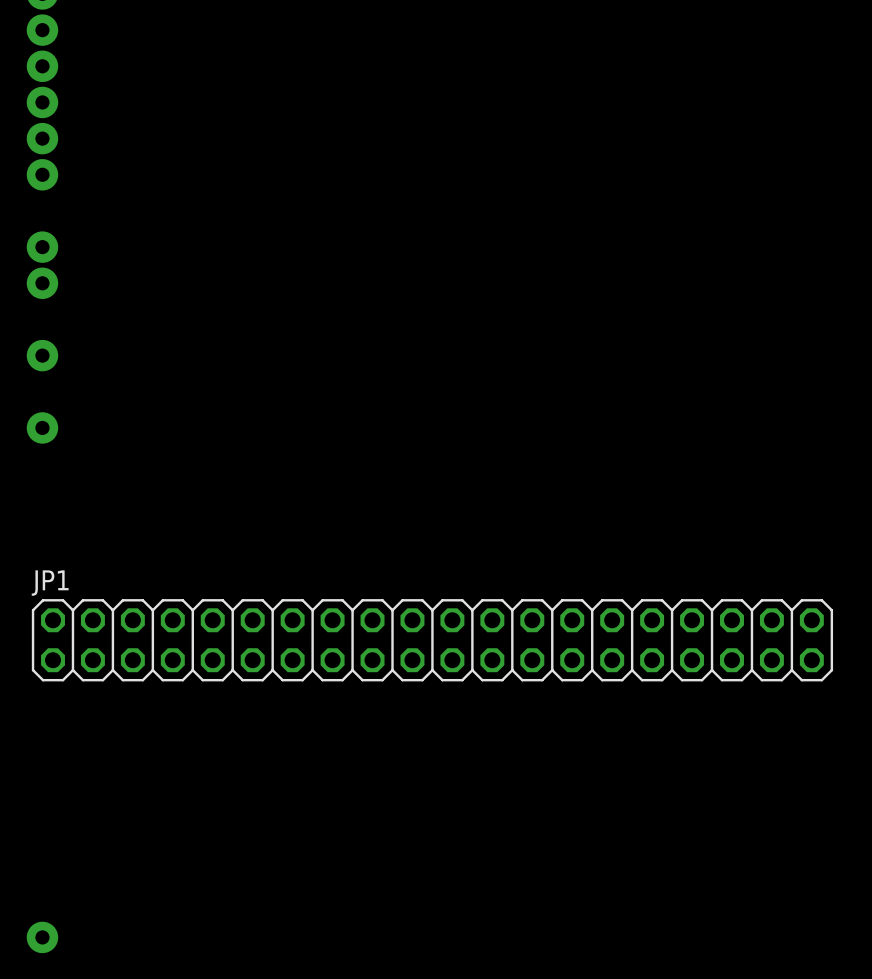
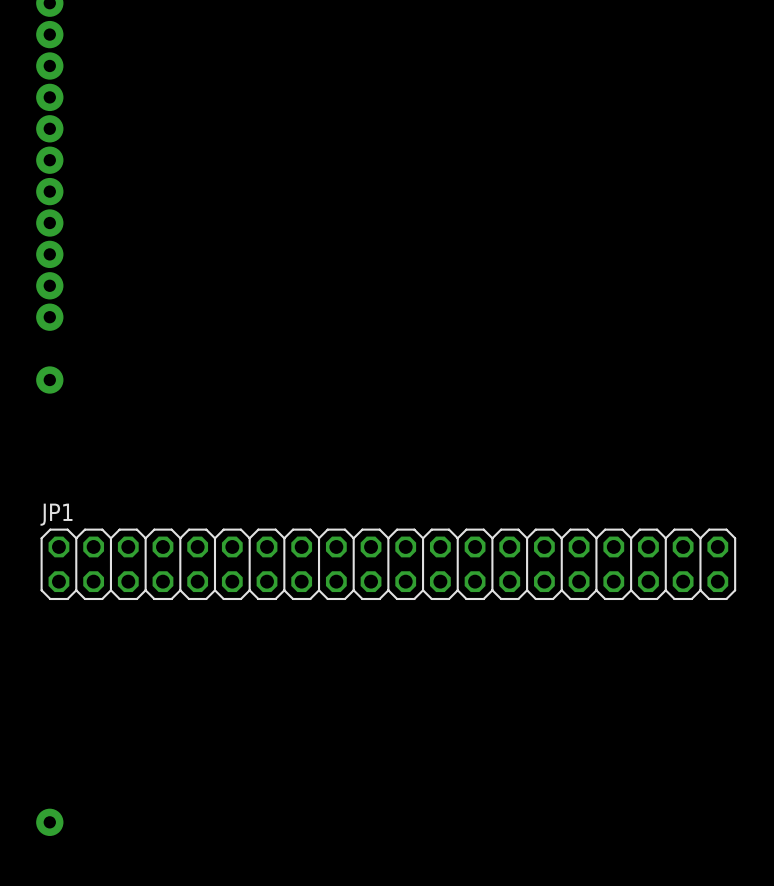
part: none -> (49, 191)
part: none -> (49, 285)

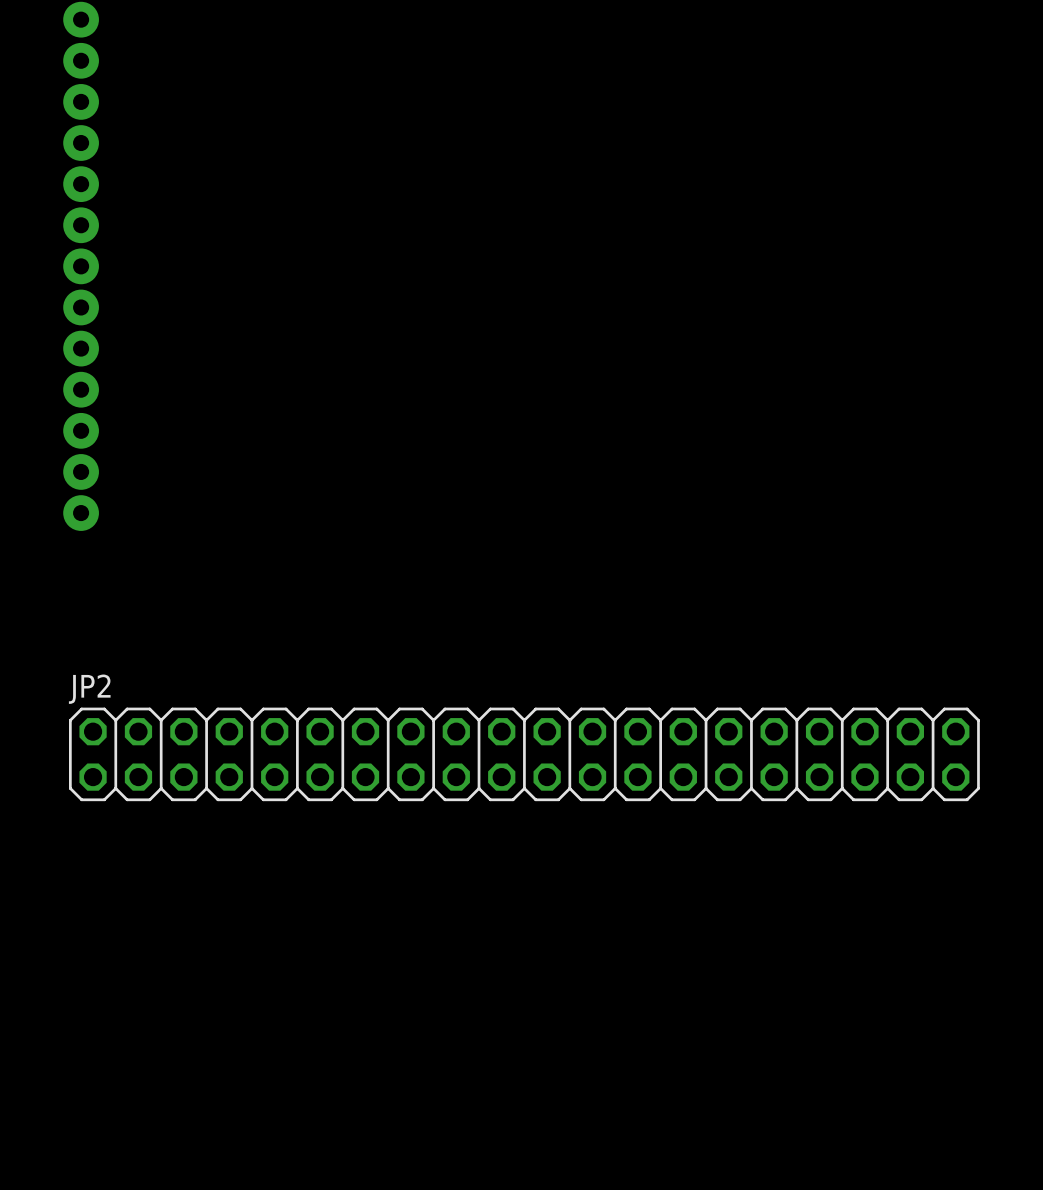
part: none -> (81, 471)
JP1 name: JP1 (56, 514) -> JP2 (89, 689)
part: (49, 822) -> none

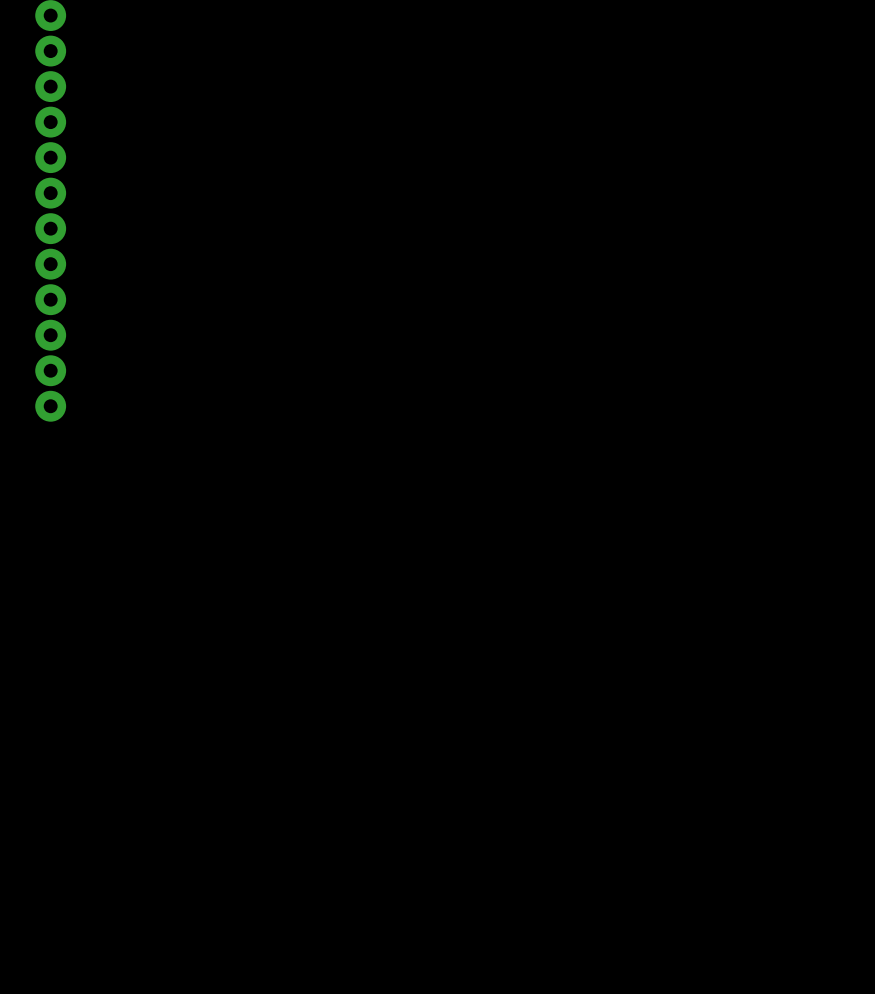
JP2: (524, 754) -> none

